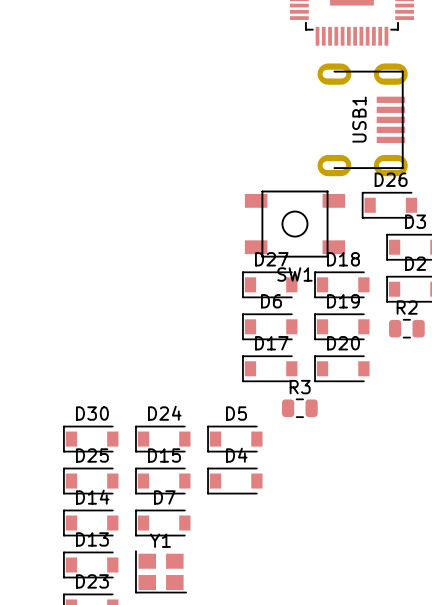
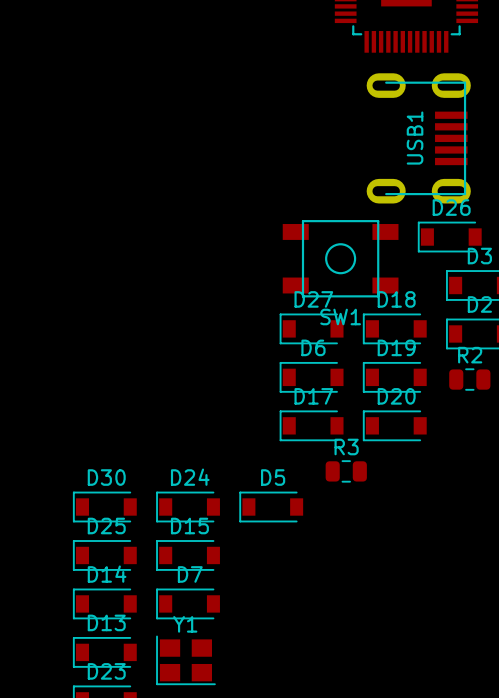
D4: (234, 481) -> none

